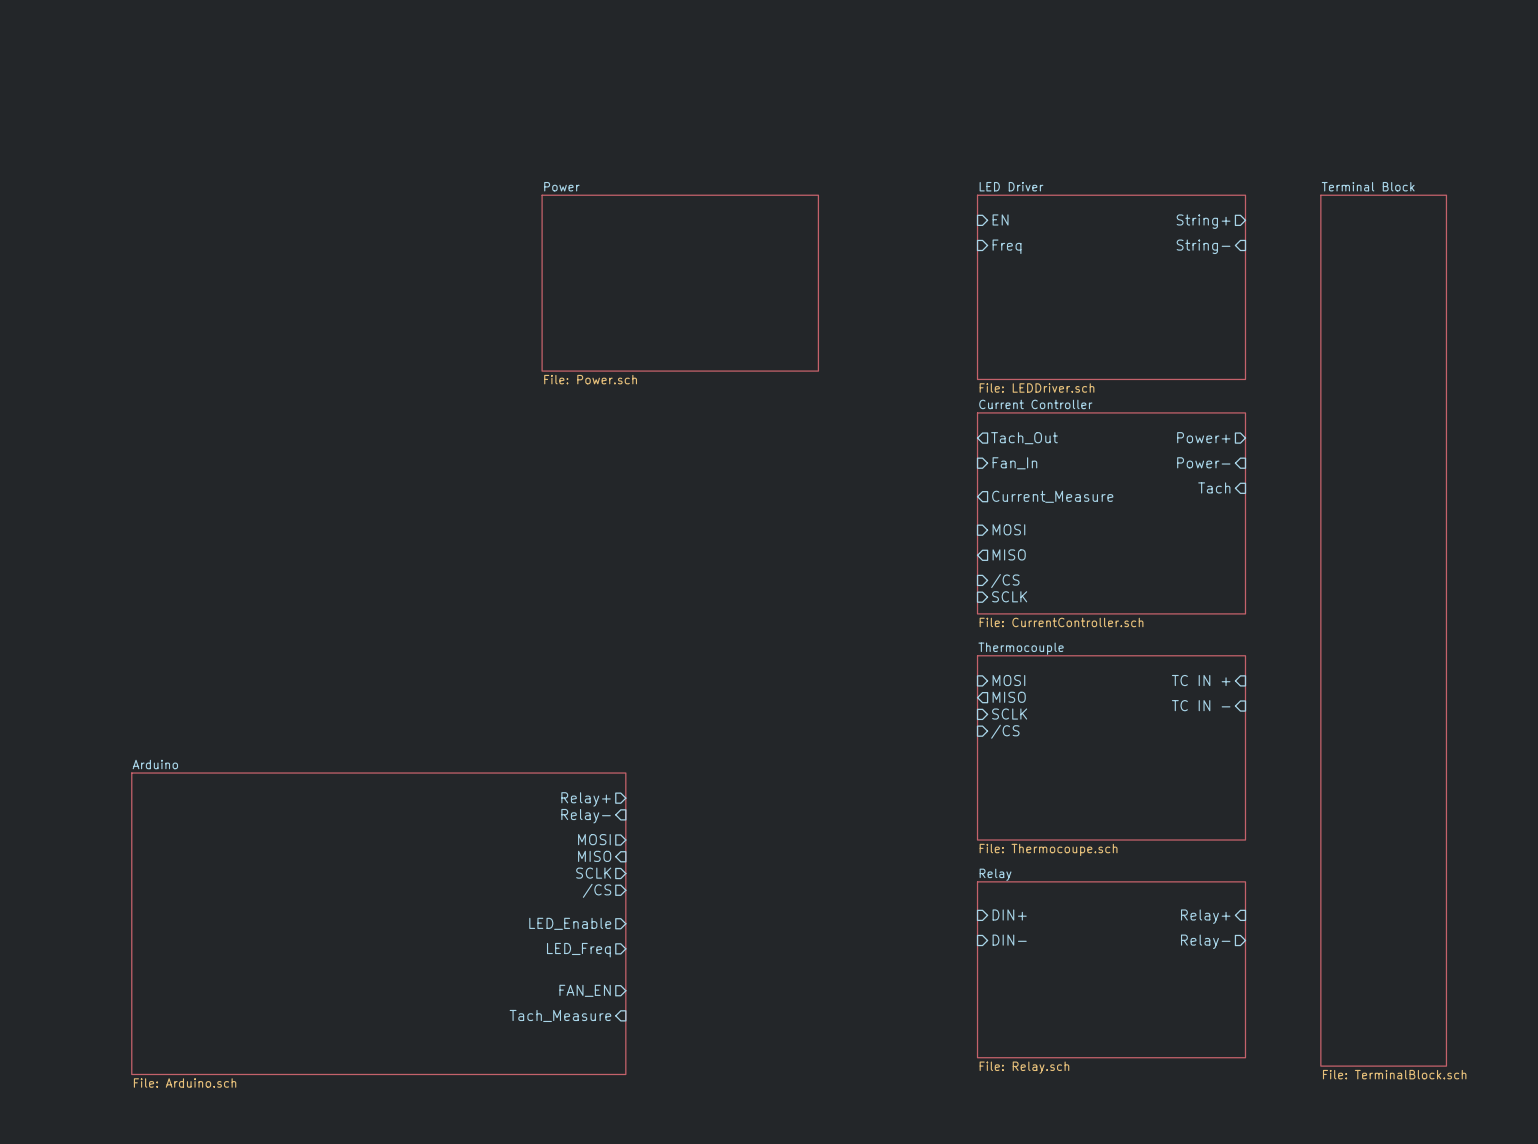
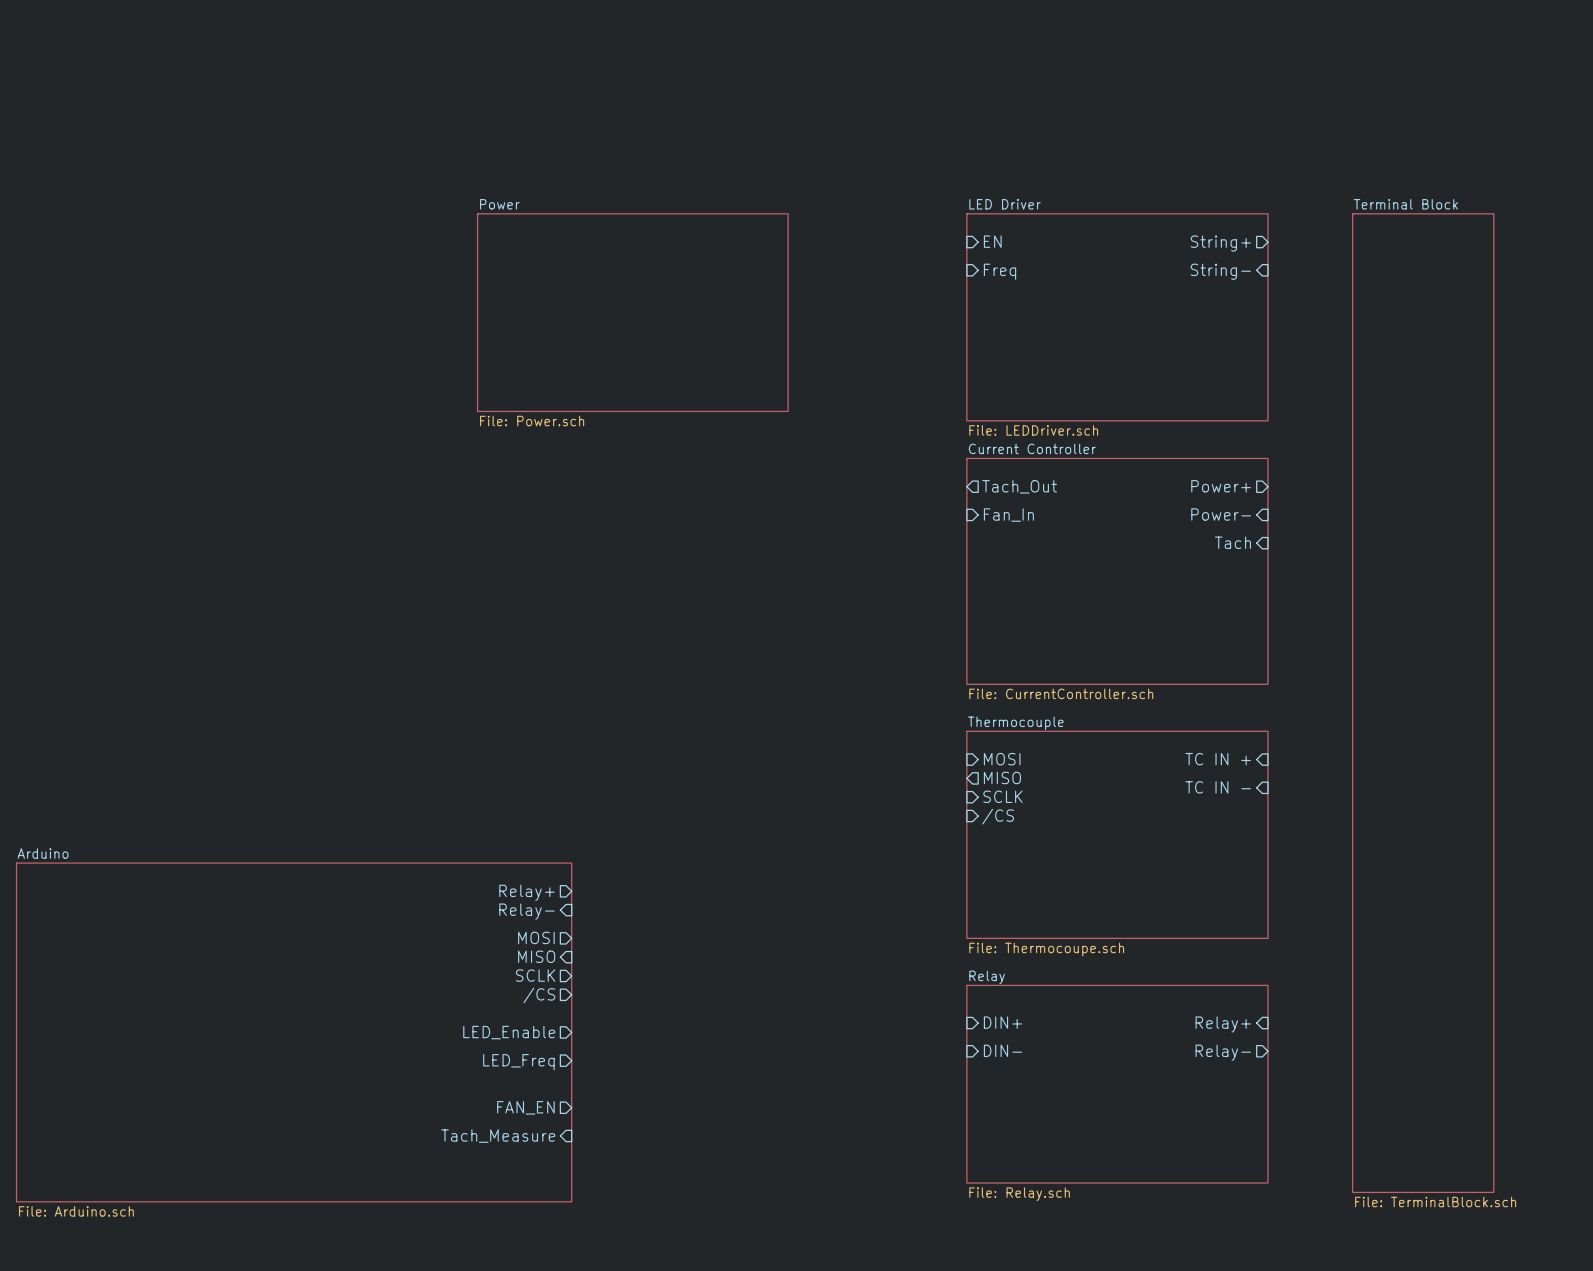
sheet pin: Current_Measure (1052, 496) -> none
sheet pin: MOSI (1008, 529) -> none
sheet pin: MISO (1009, 554) -> none
sheet pin: /CS (1005, 581) -> none
sheet pin: SCLK (1009, 596) -> none

